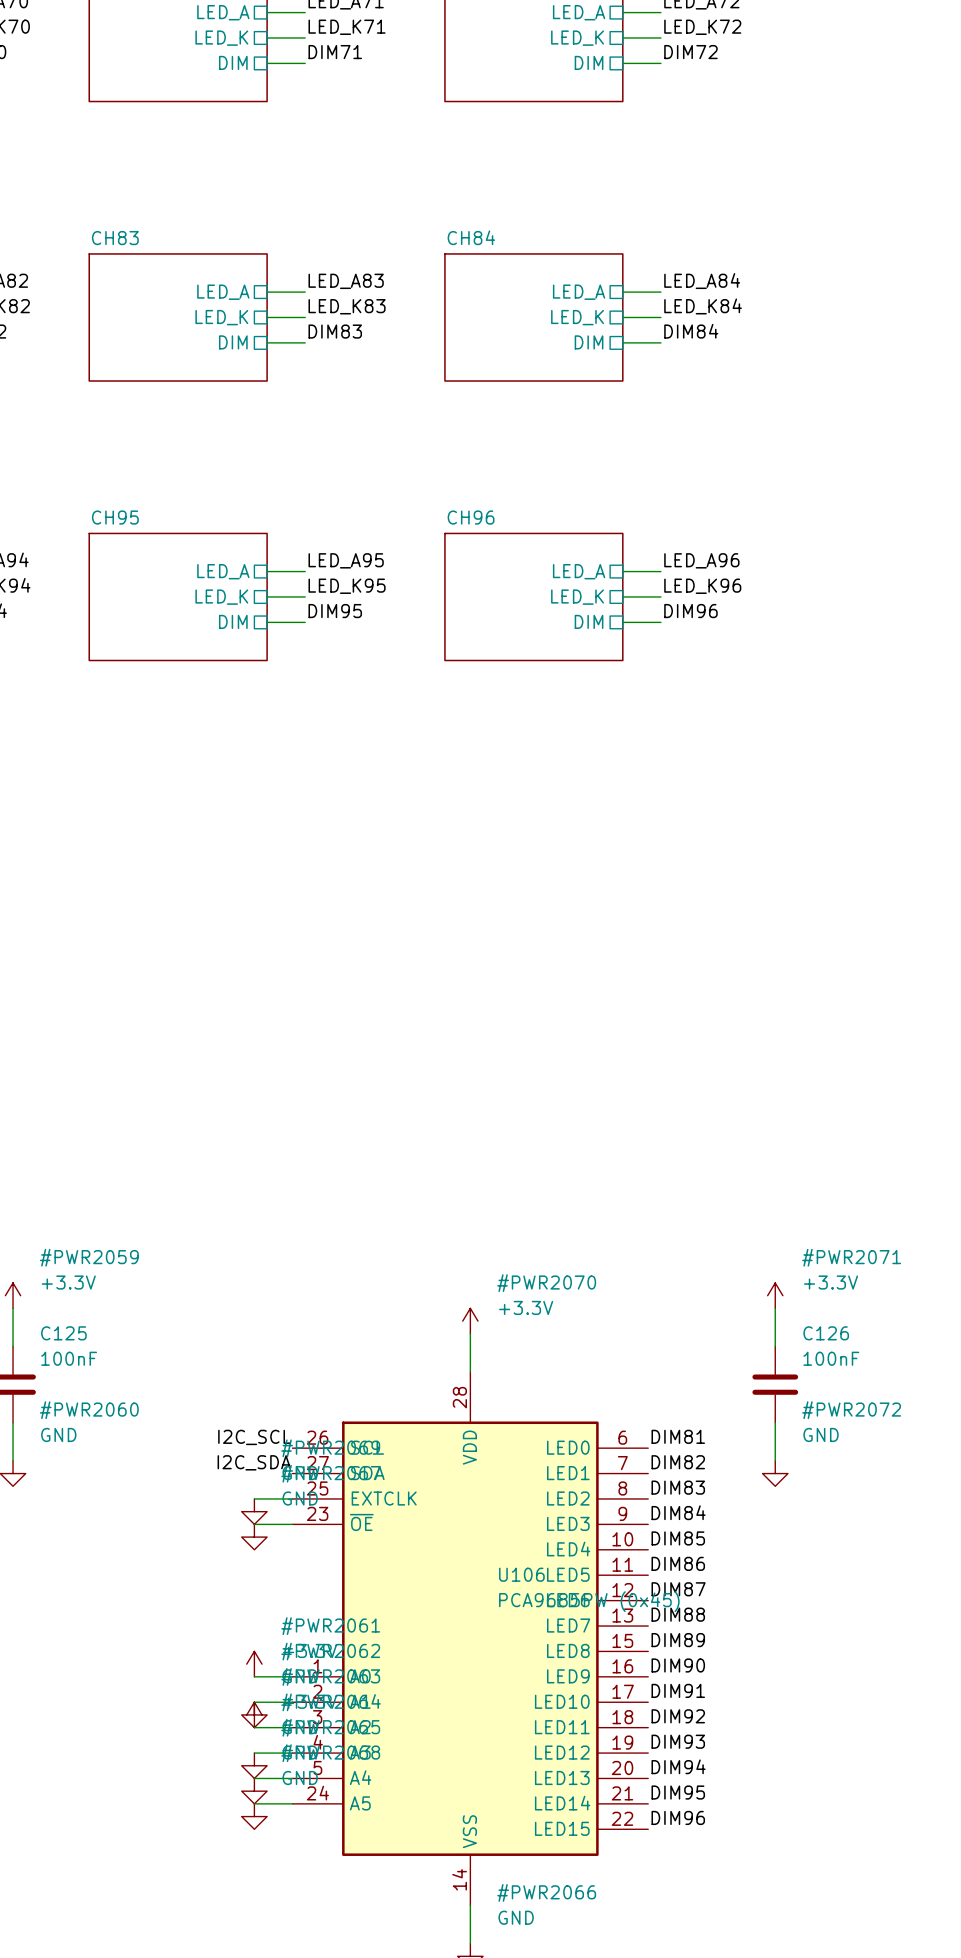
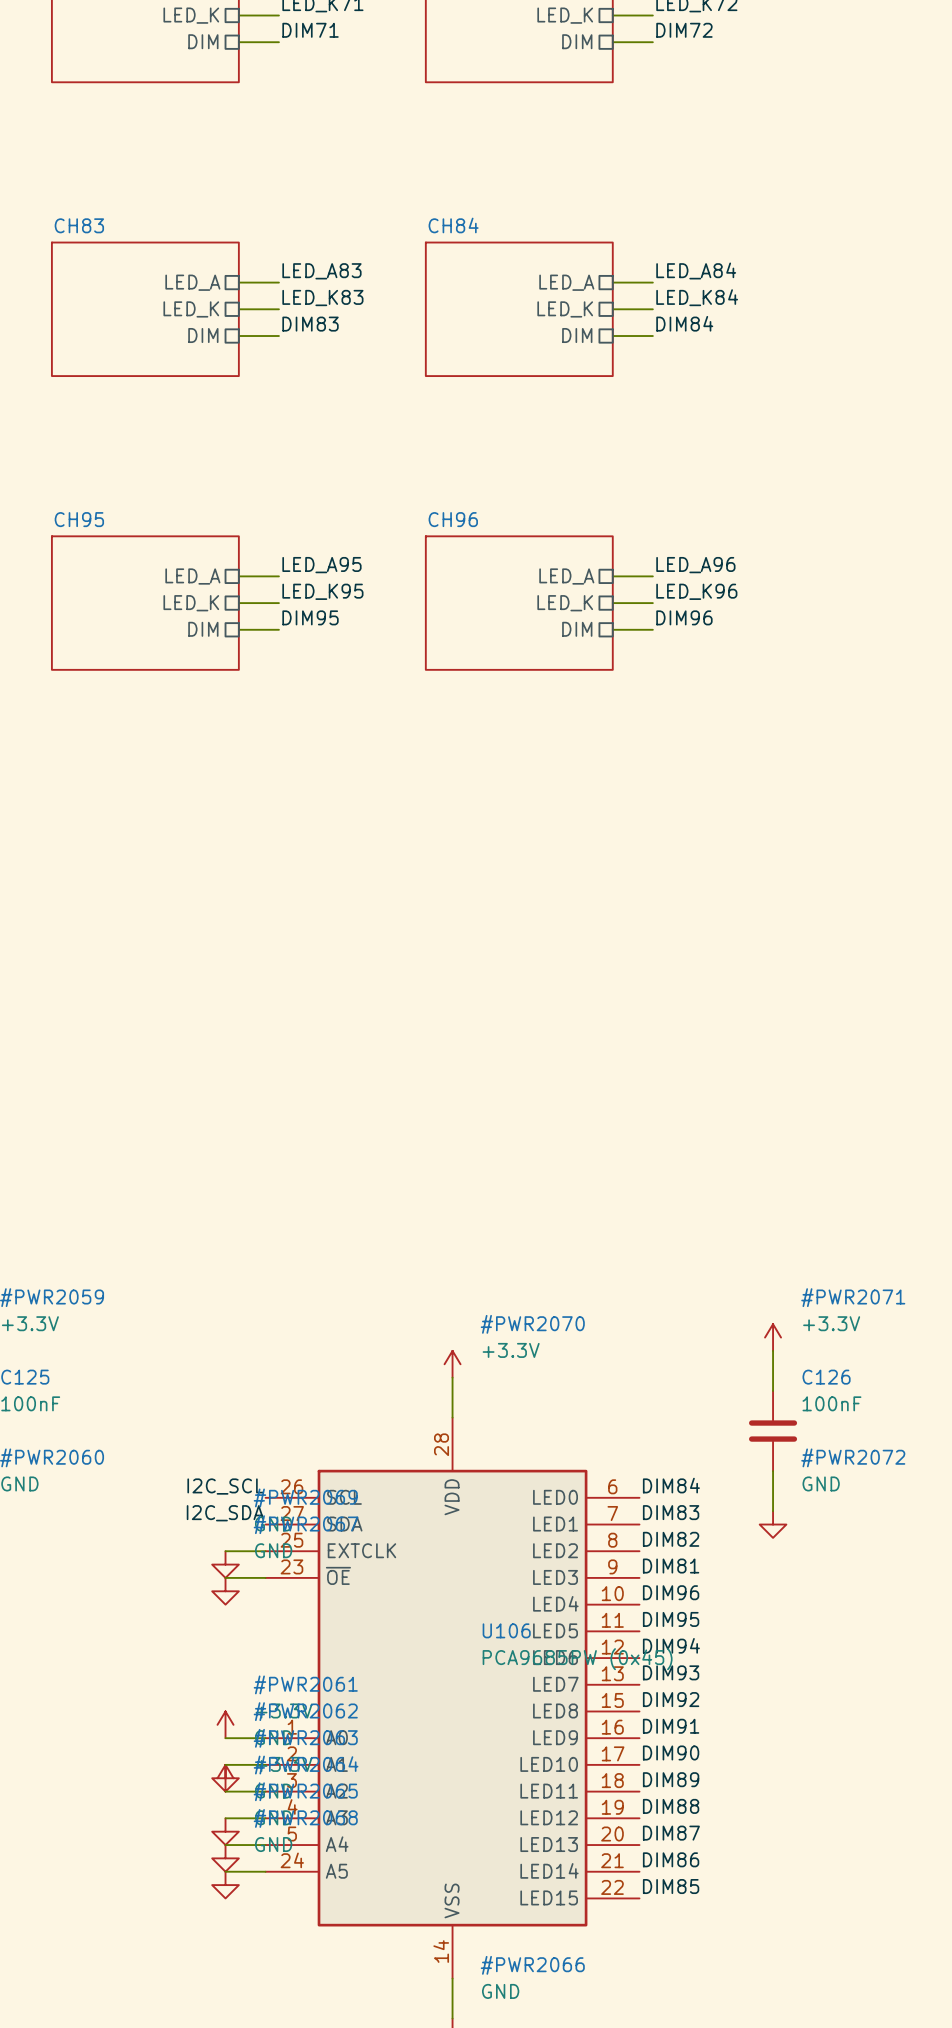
label: DIM81 (678, 1436) -> DIM84 (671, 1485)
label: DIM82 (678, 1462) -> DIM83 (671, 1512)
label: DIM83 (678, 1487) -> DIM82 (671, 1539)
label: DIM84 (678, 1512) -> DIM81 (671, 1566)
label: DIM85 (678, 1538) -> DIM96 (671, 1592)
label: DIM86 (678, 1563) -> DIM95 (671, 1619)
label: DIM87 (678, 1589) -> DIM94 (671, 1645)
label: DIM88 (678, 1614) -> DIM93 (671, 1672)
label: DIM89 (678, 1640) -> DIM92 (671, 1699)
label: DIM90 (678, 1665) -> DIM91 (671, 1726)
label: DIM91 (678, 1690) -> DIM90 (671, 1752)
label: DIM92 (678, 1716) -> DIM89 (671, 1779)
label: DIM93 (678, 1741) -> DIM88 (671, 1806)
label: DIM94 (678, 1766) -> DIM87 (671, 1833)
label: DIM95 (678, 1792) -> DIM86 (671, 1859)
label: DIM96 (678, 1817) -> DIM85 (671, 1886)

